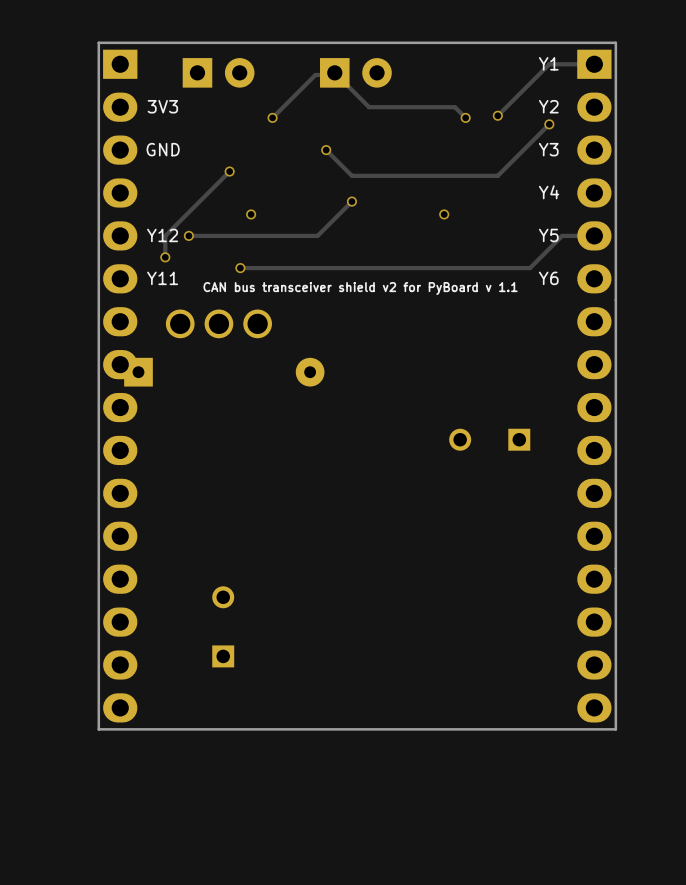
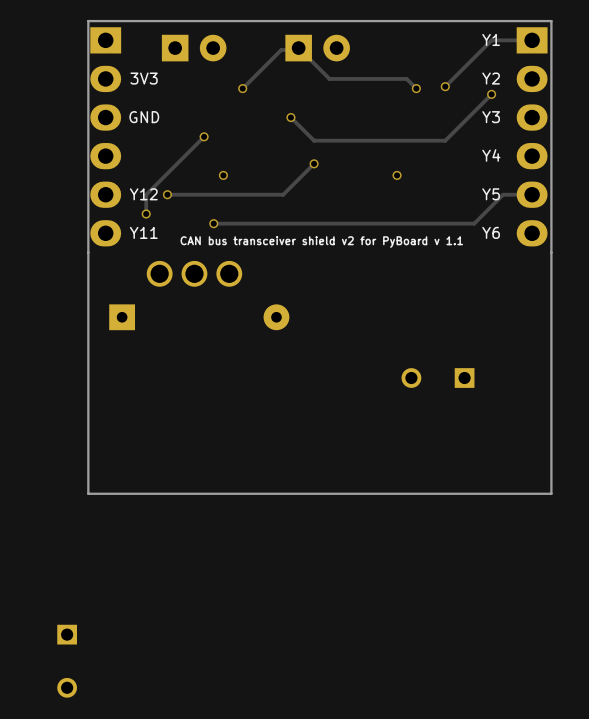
board edge: (100, 42) (98, 42) (98, 729) (615, 729) (615, 568) -> (88, 21) (88, 493) (551, 493)
part: none -> (105, 136)
part: (120, 386) -> none
part: (594, 386) -> none
part rotation: 0° (223, 626) -> 180° (67, 661)
part position: (223, 626) -> (67, 661)

